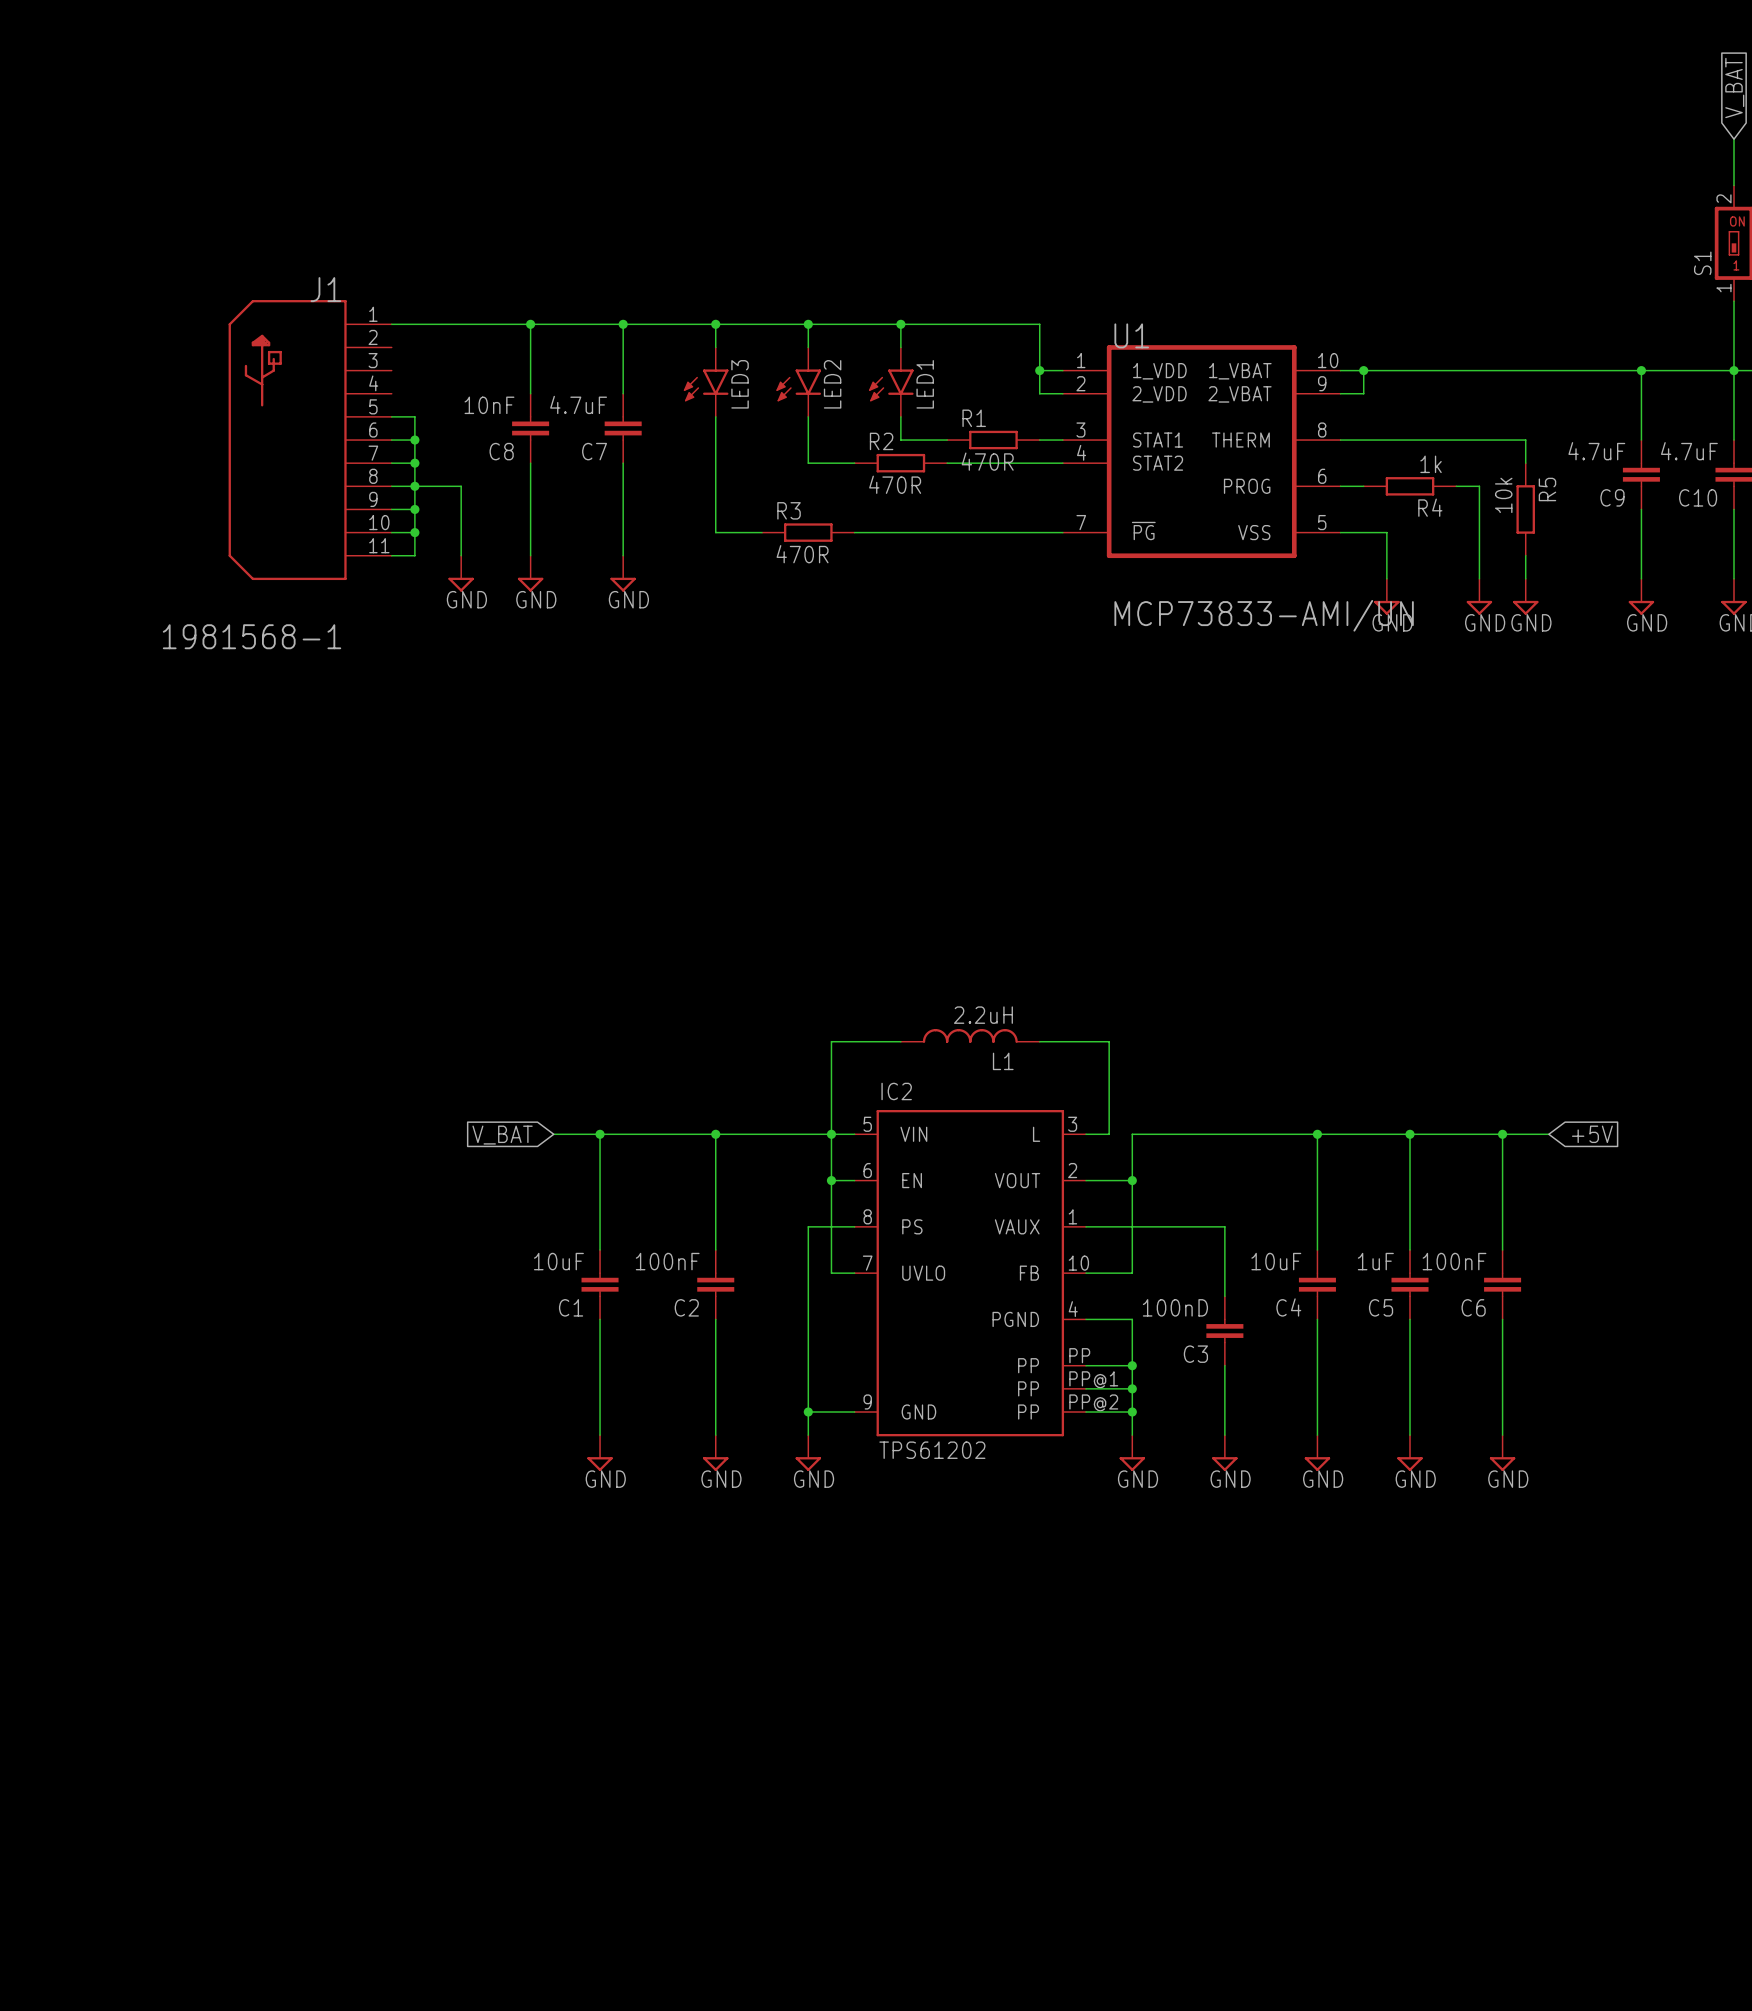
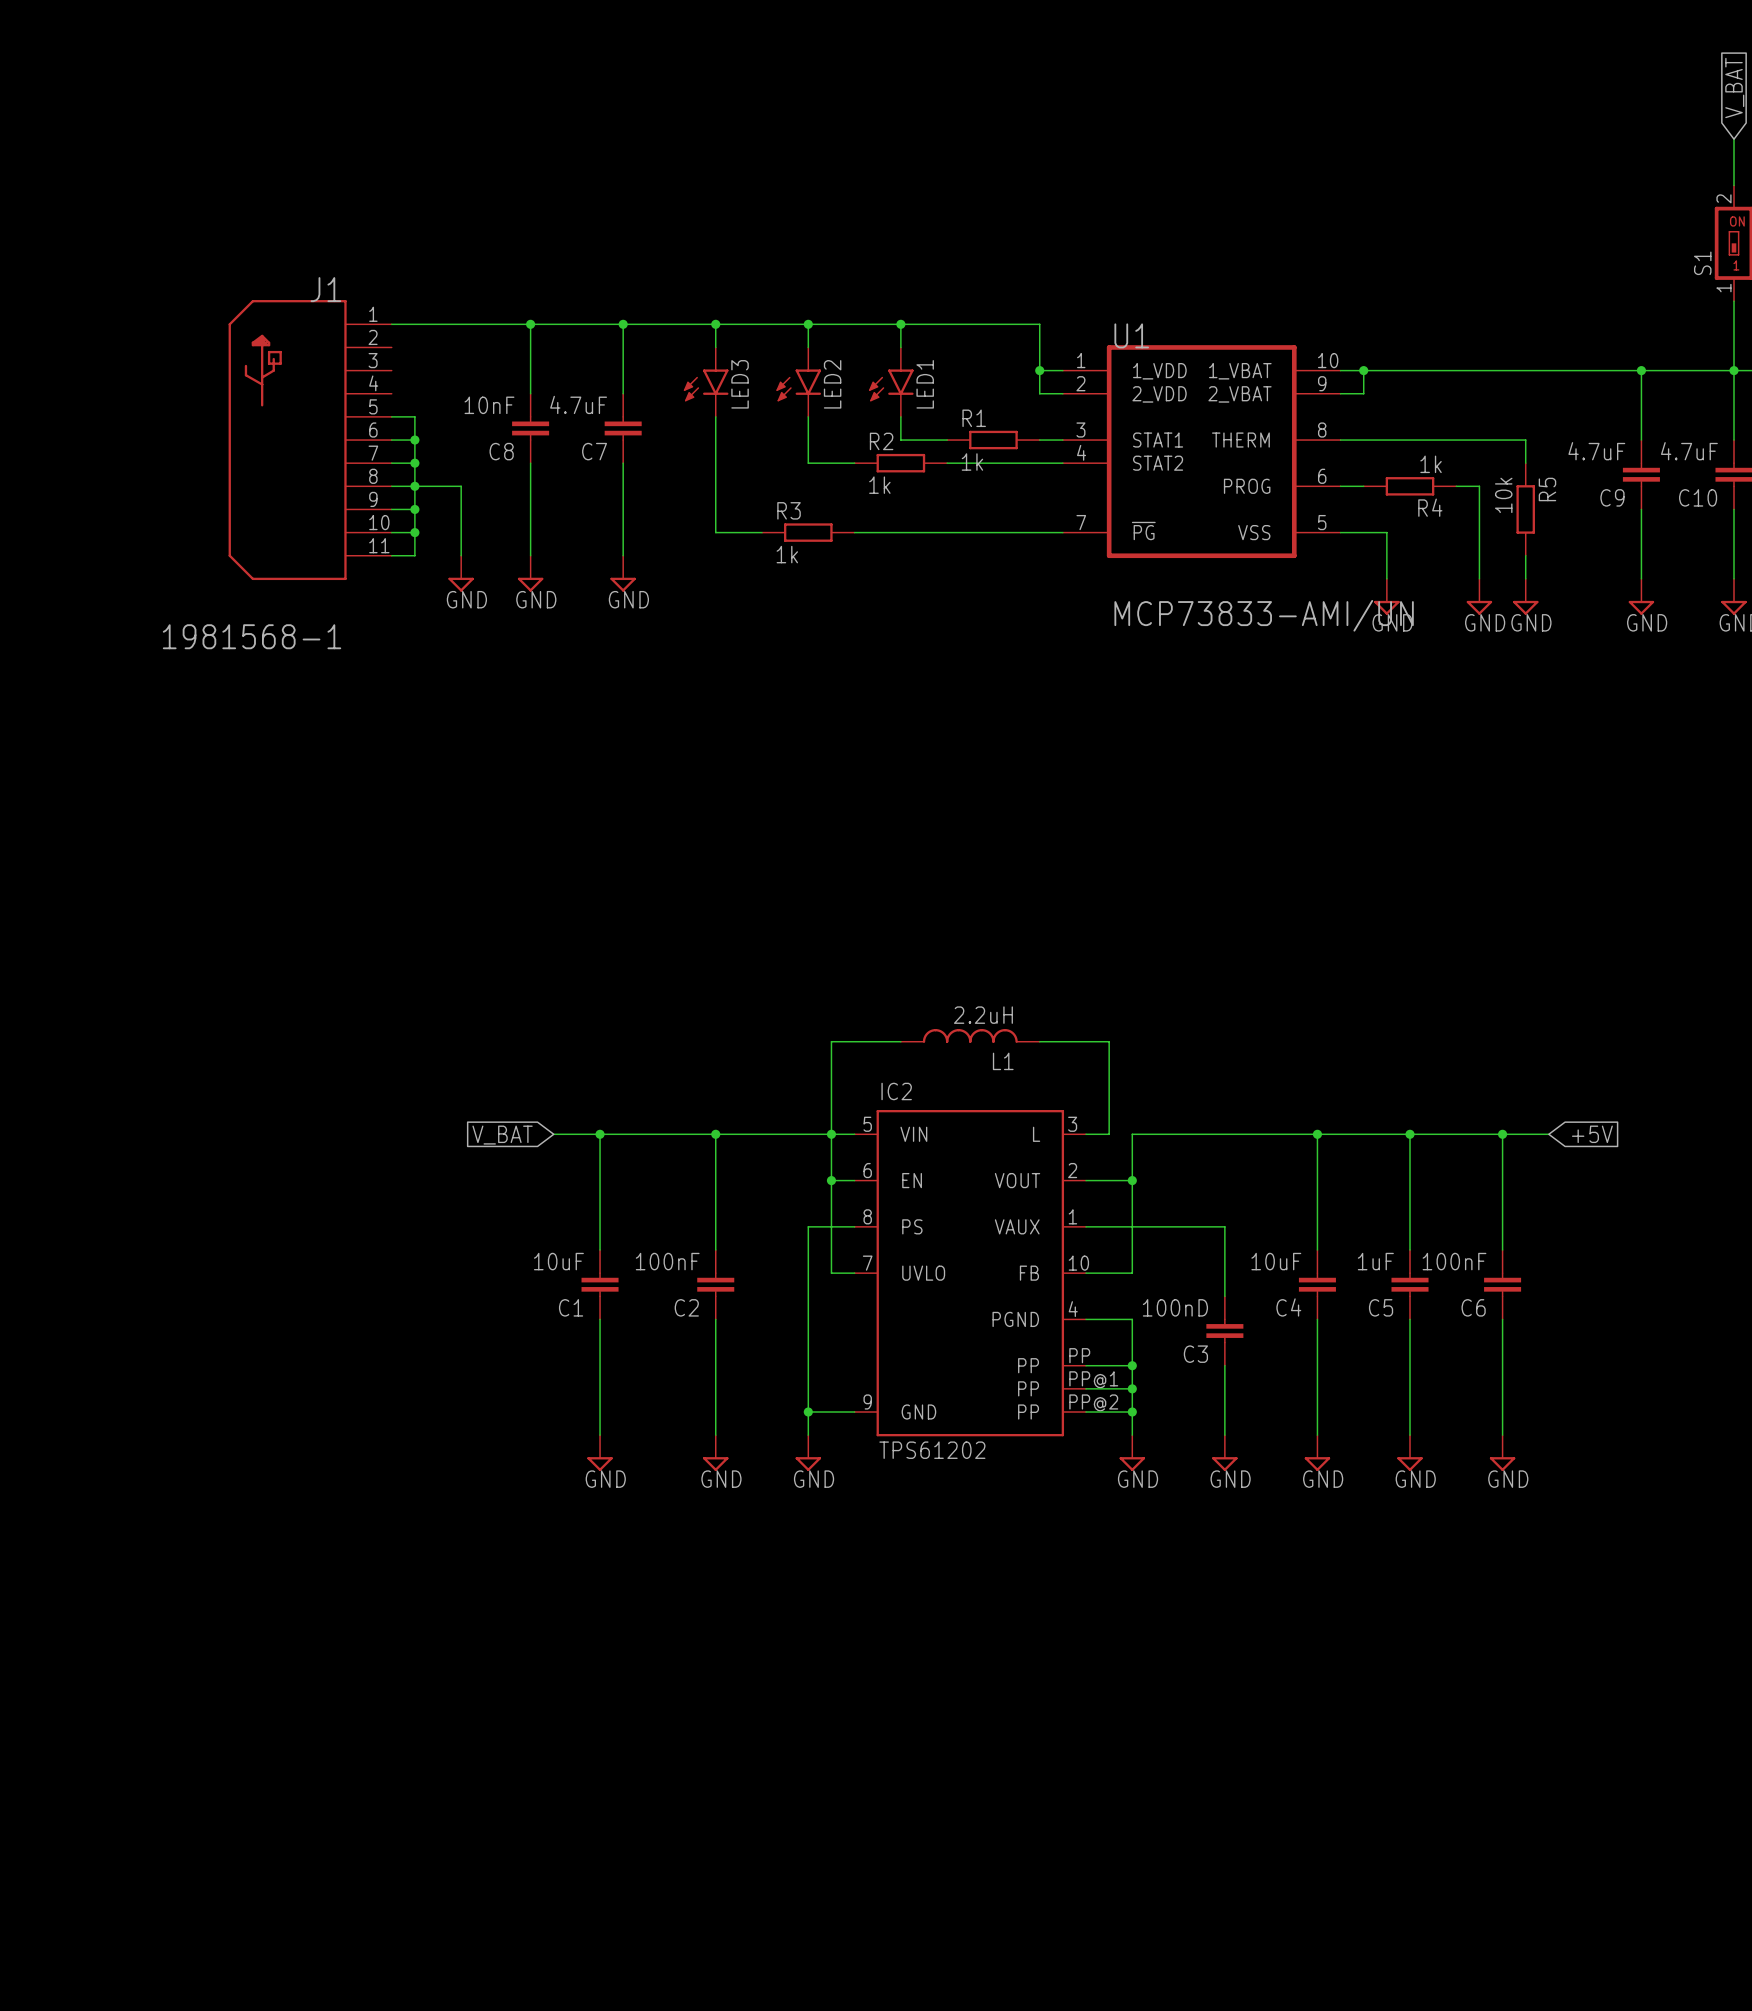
R1 value: 470R (987, 461) -> 1k (972, 462)
R2 value: 470R (895, 484) -> 1k (879, 485)
R3 value: 470R (802, 554) -> 1k (787, 554)

